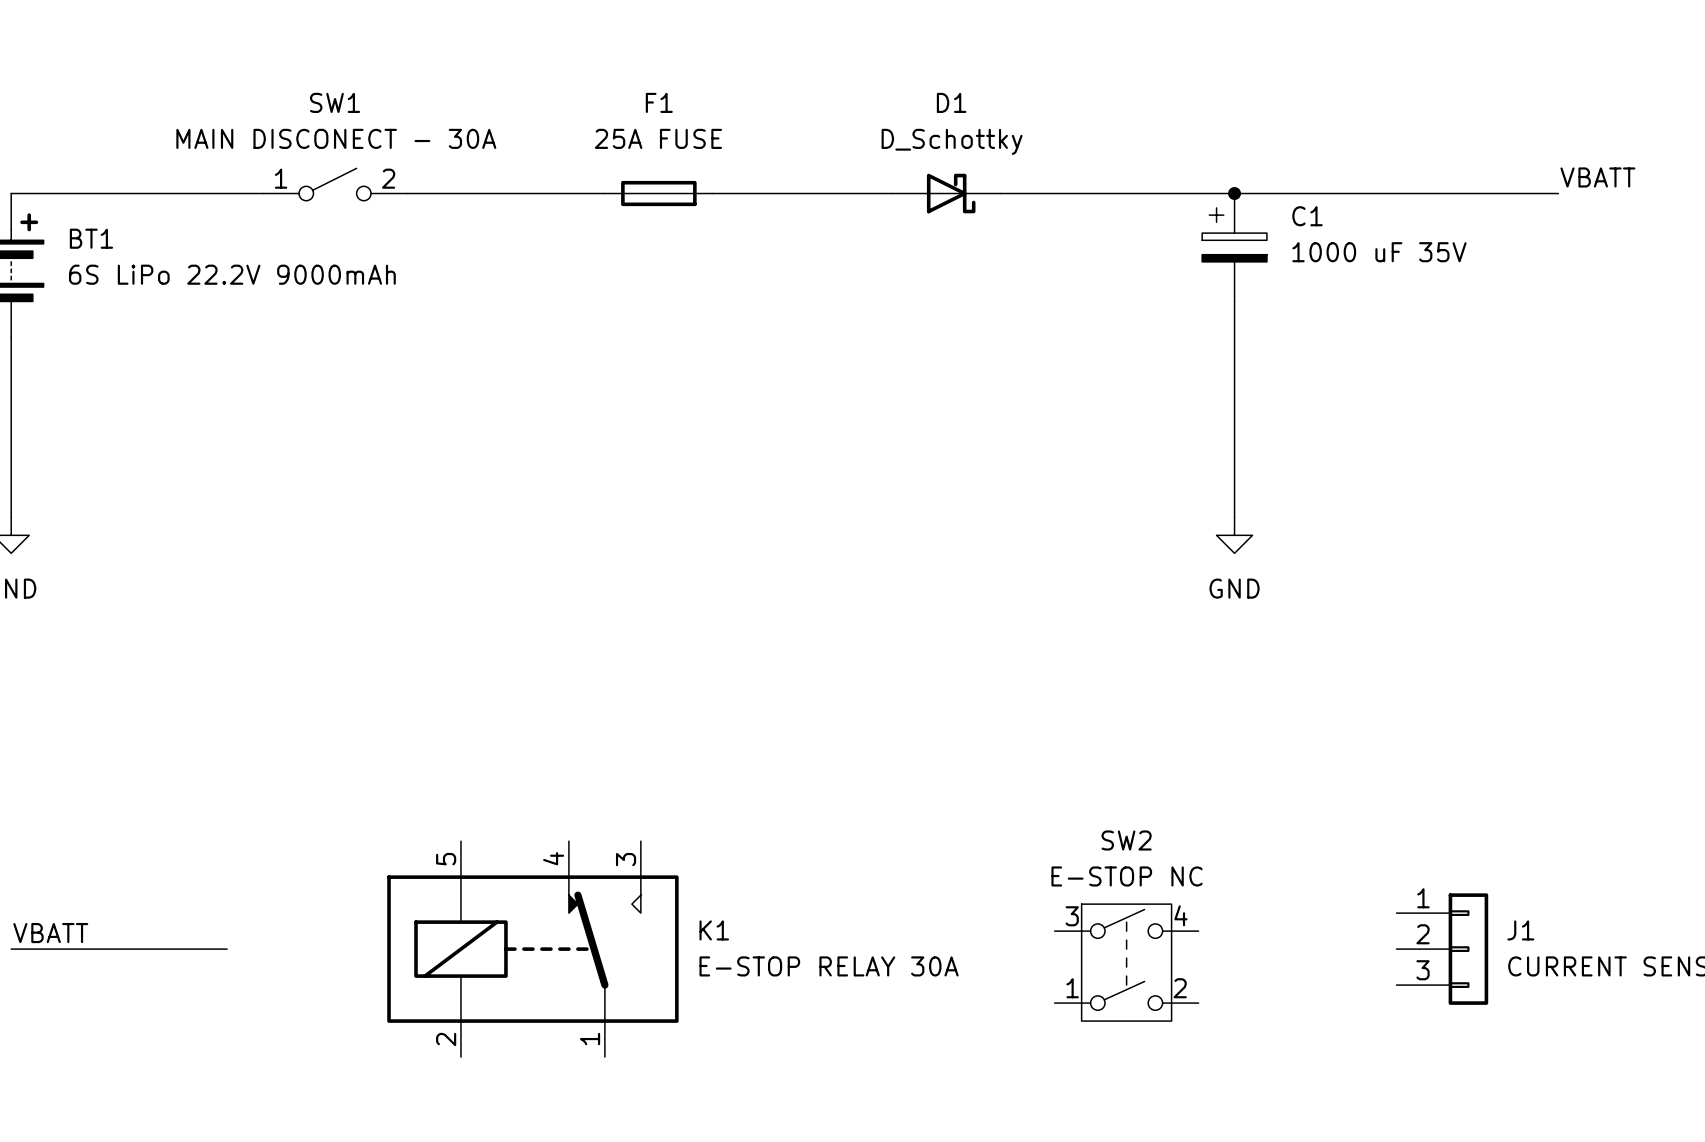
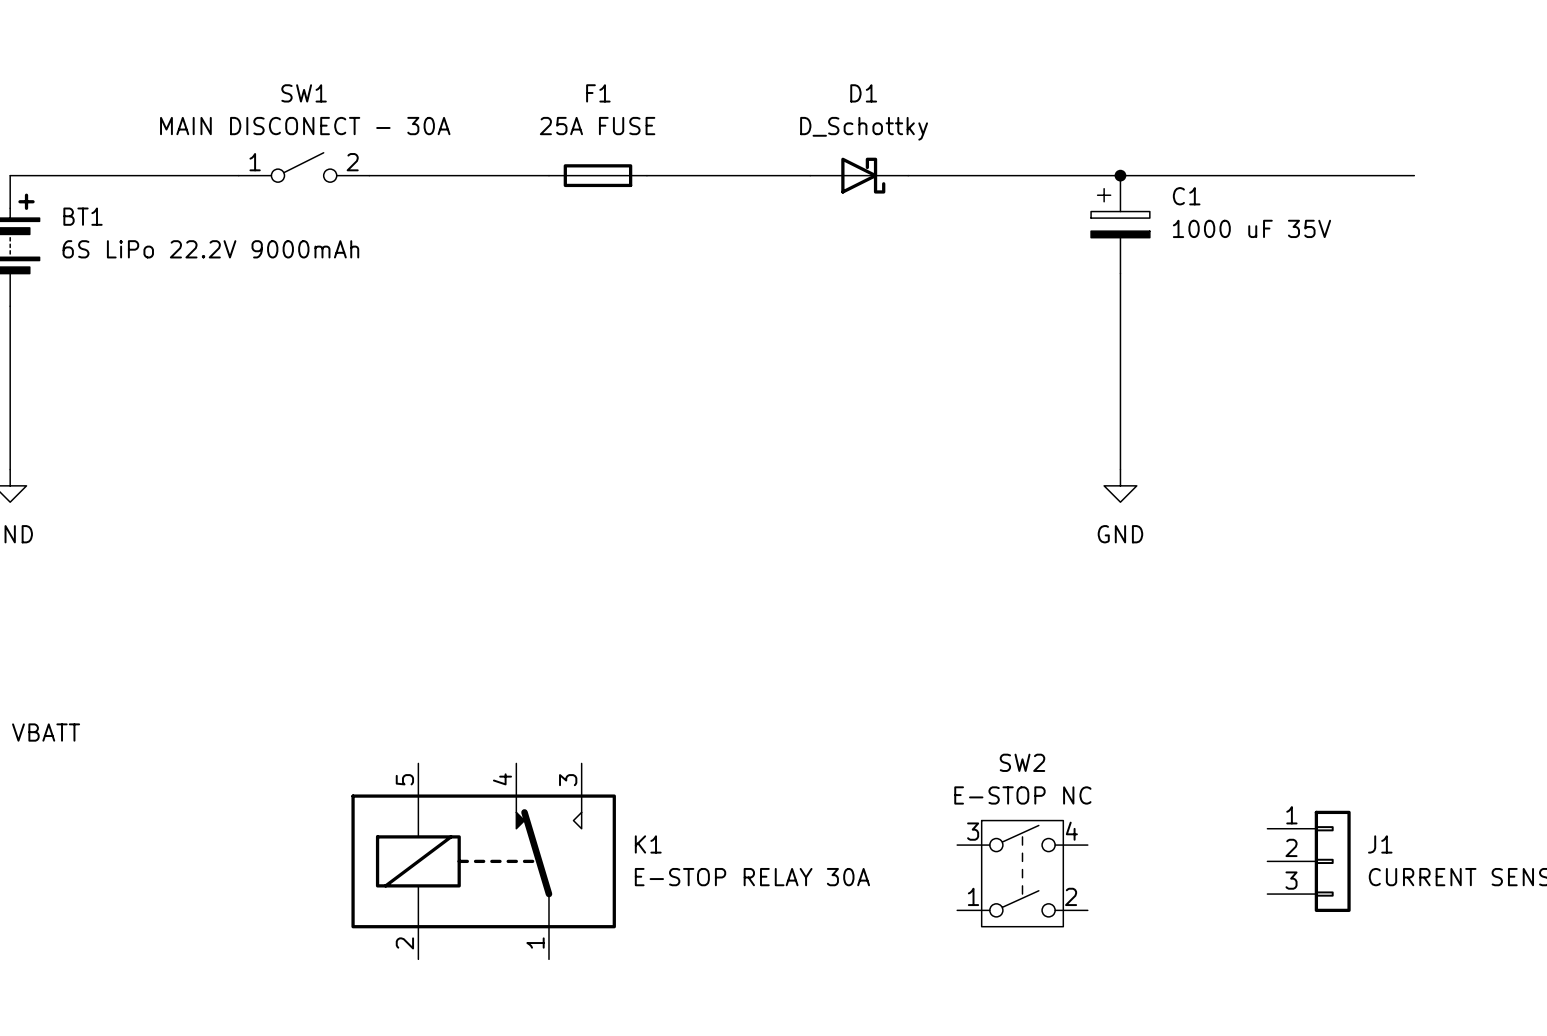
label: VBATT (1597, 177) -> none
label position: VBATT (50, 933) -> VBATT (46, 732)
wire: (11, 949) (227, 949) -> none

